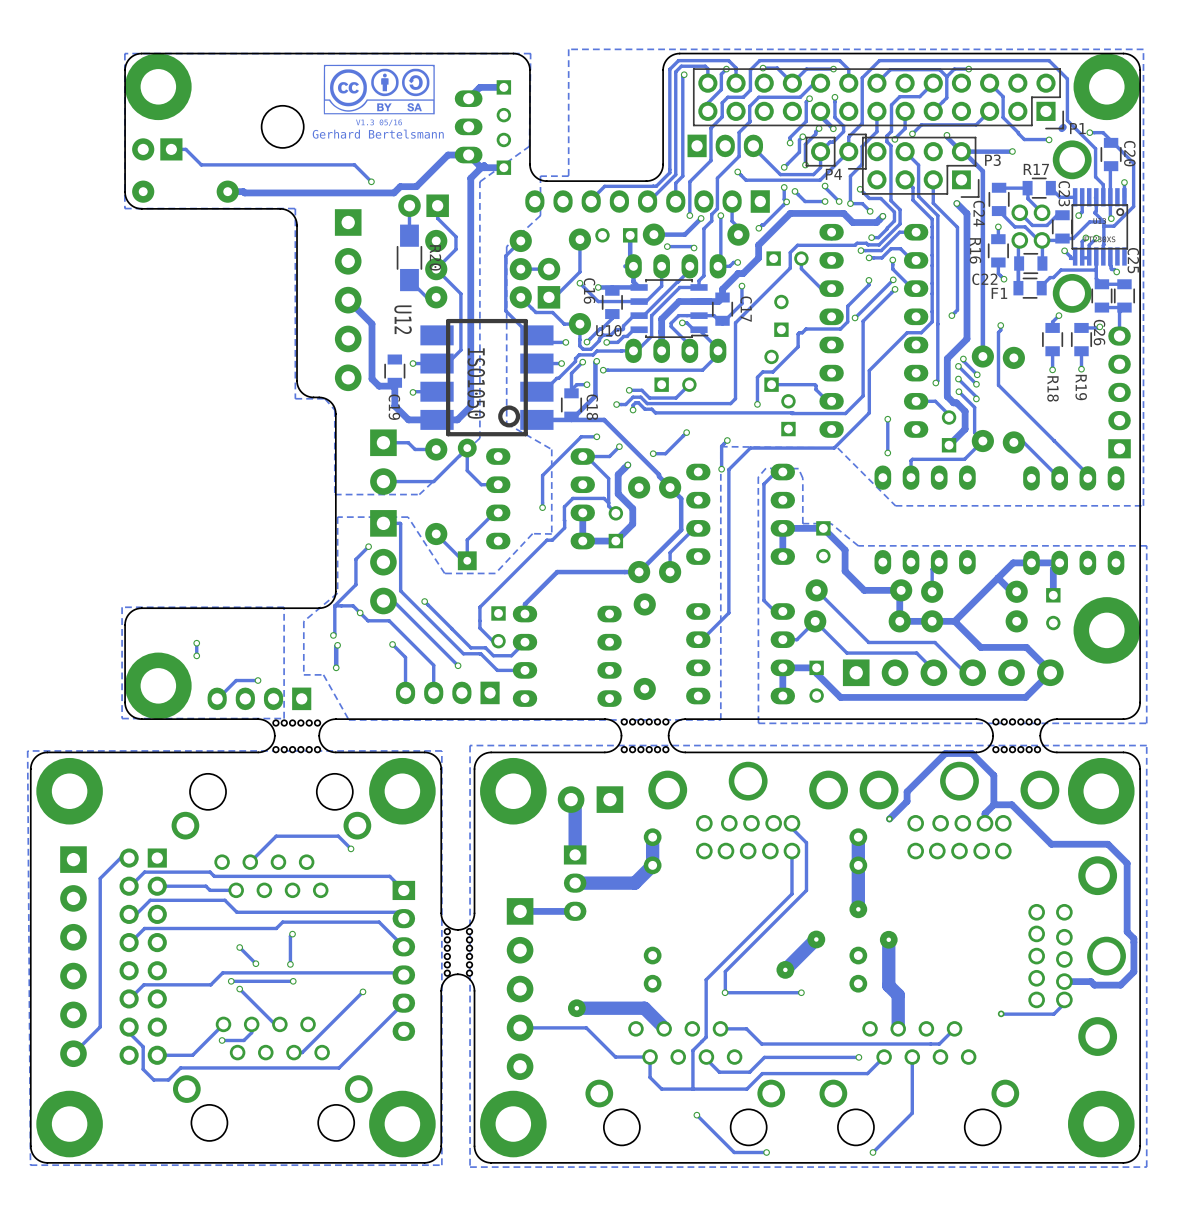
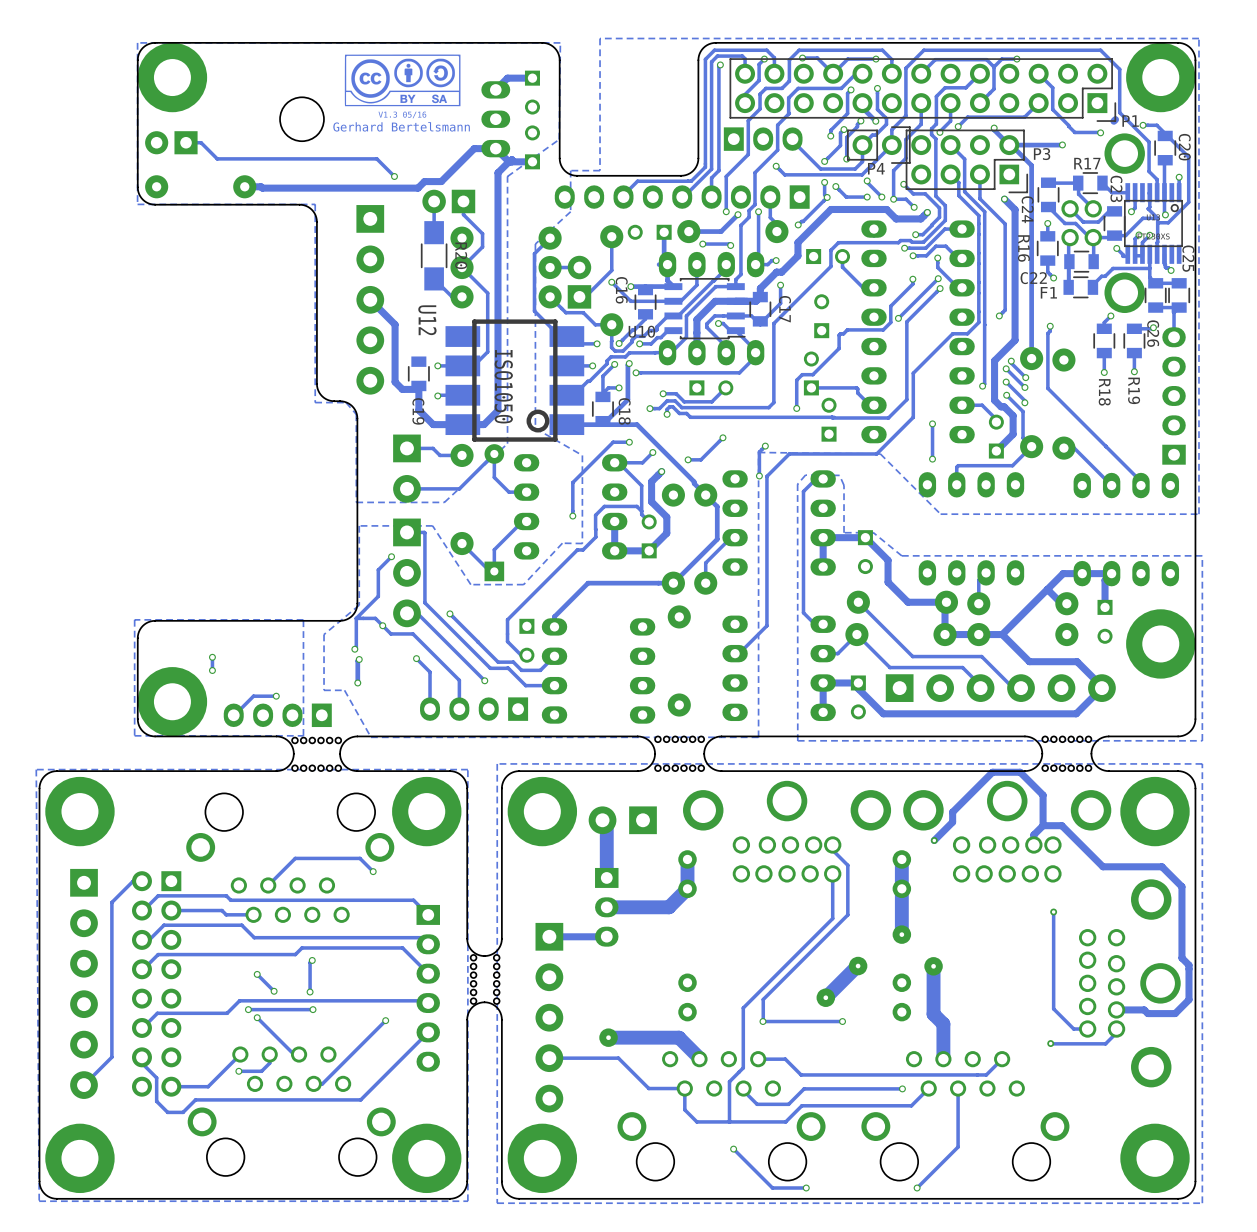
track: none -> (1053, 912) (1053, 1008) (1073, 1029) (1087, 1029)
via: none -> (1053, 912)

